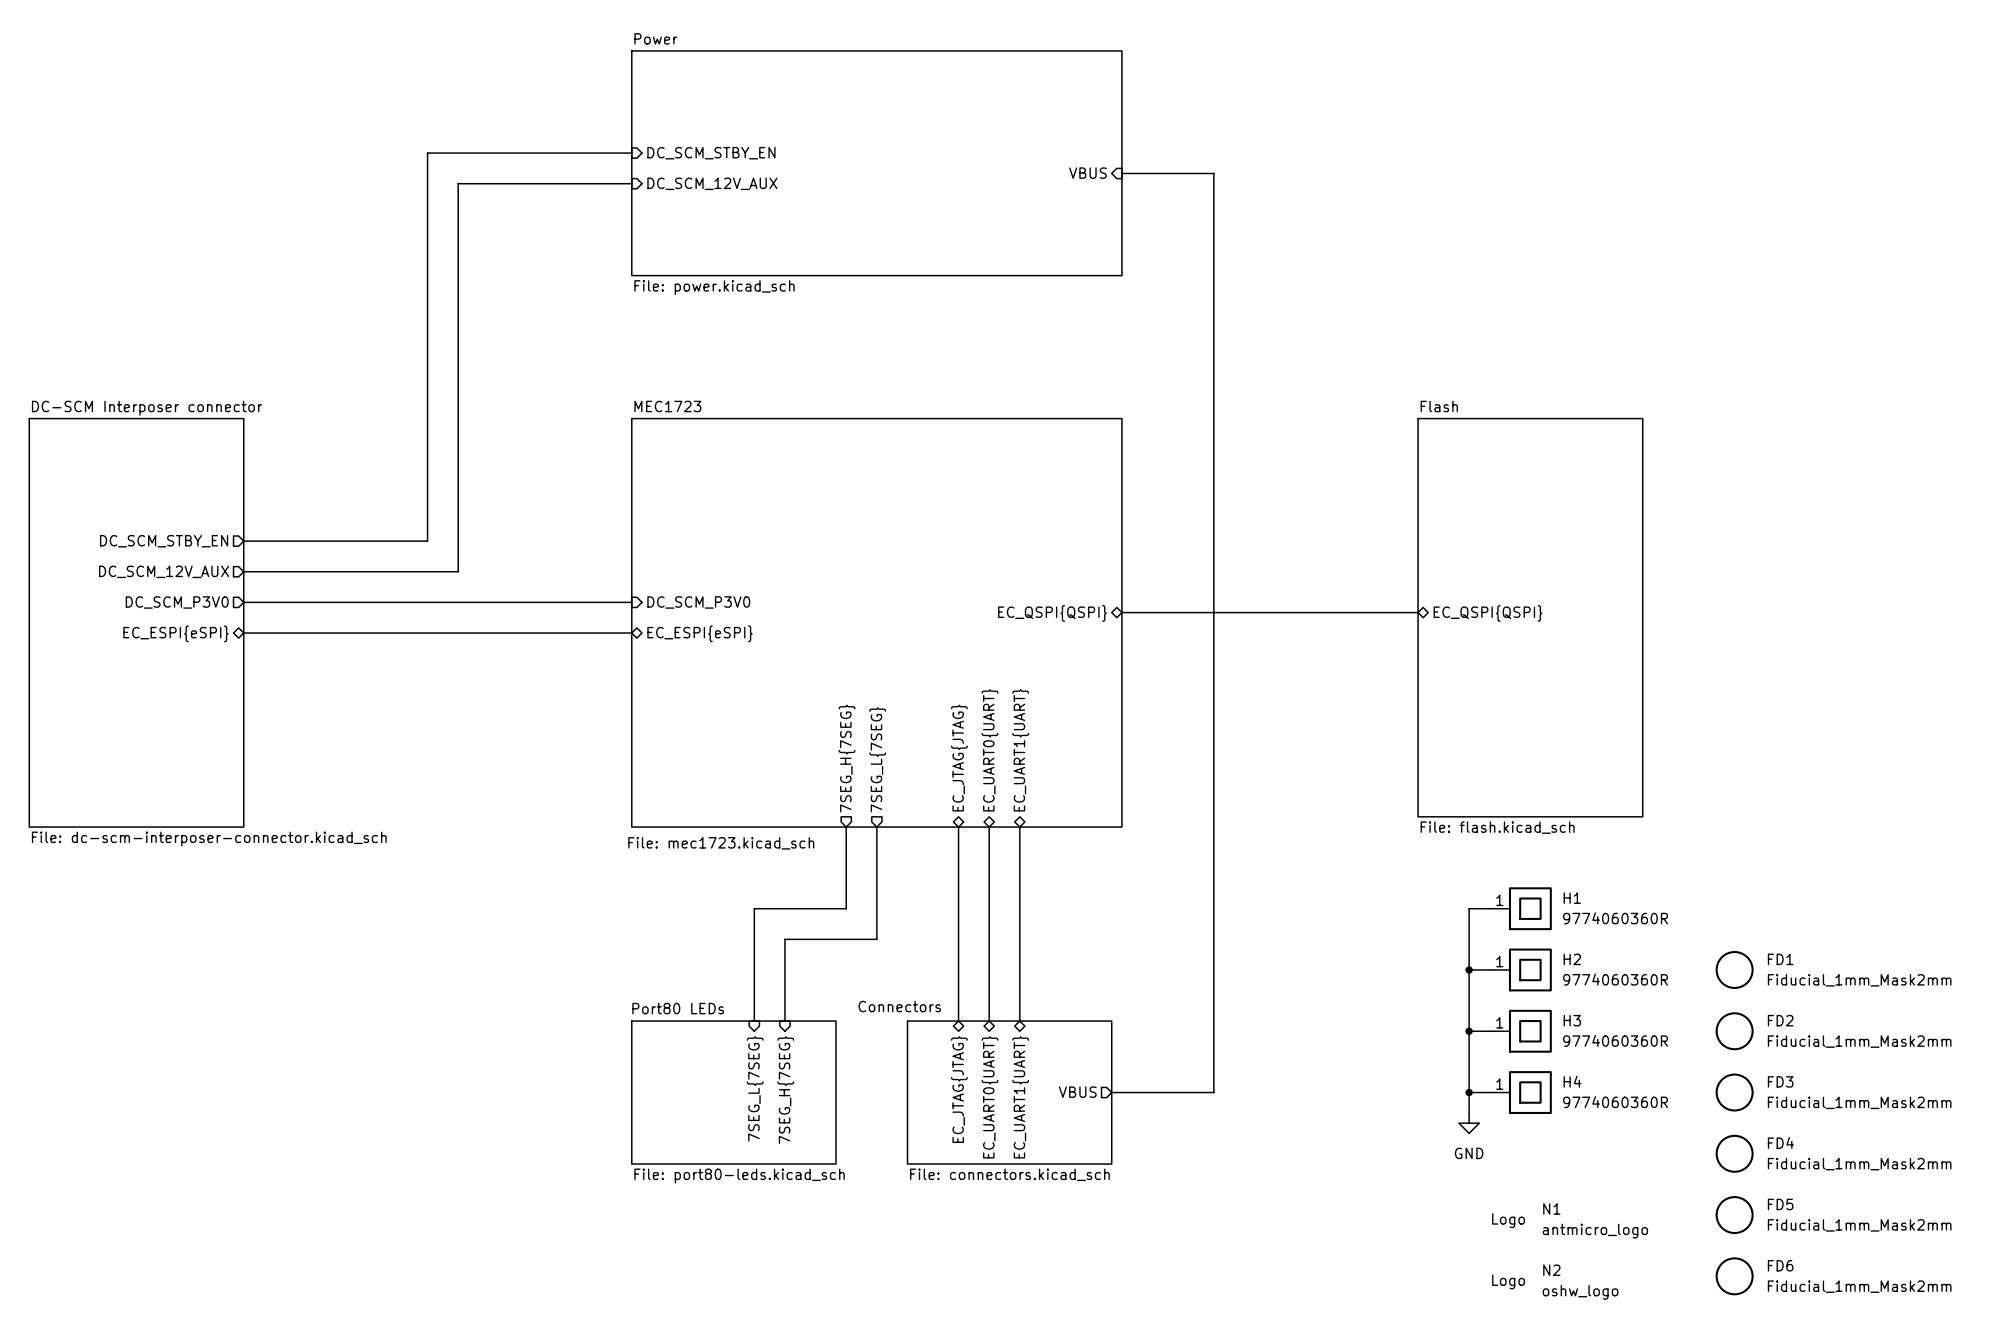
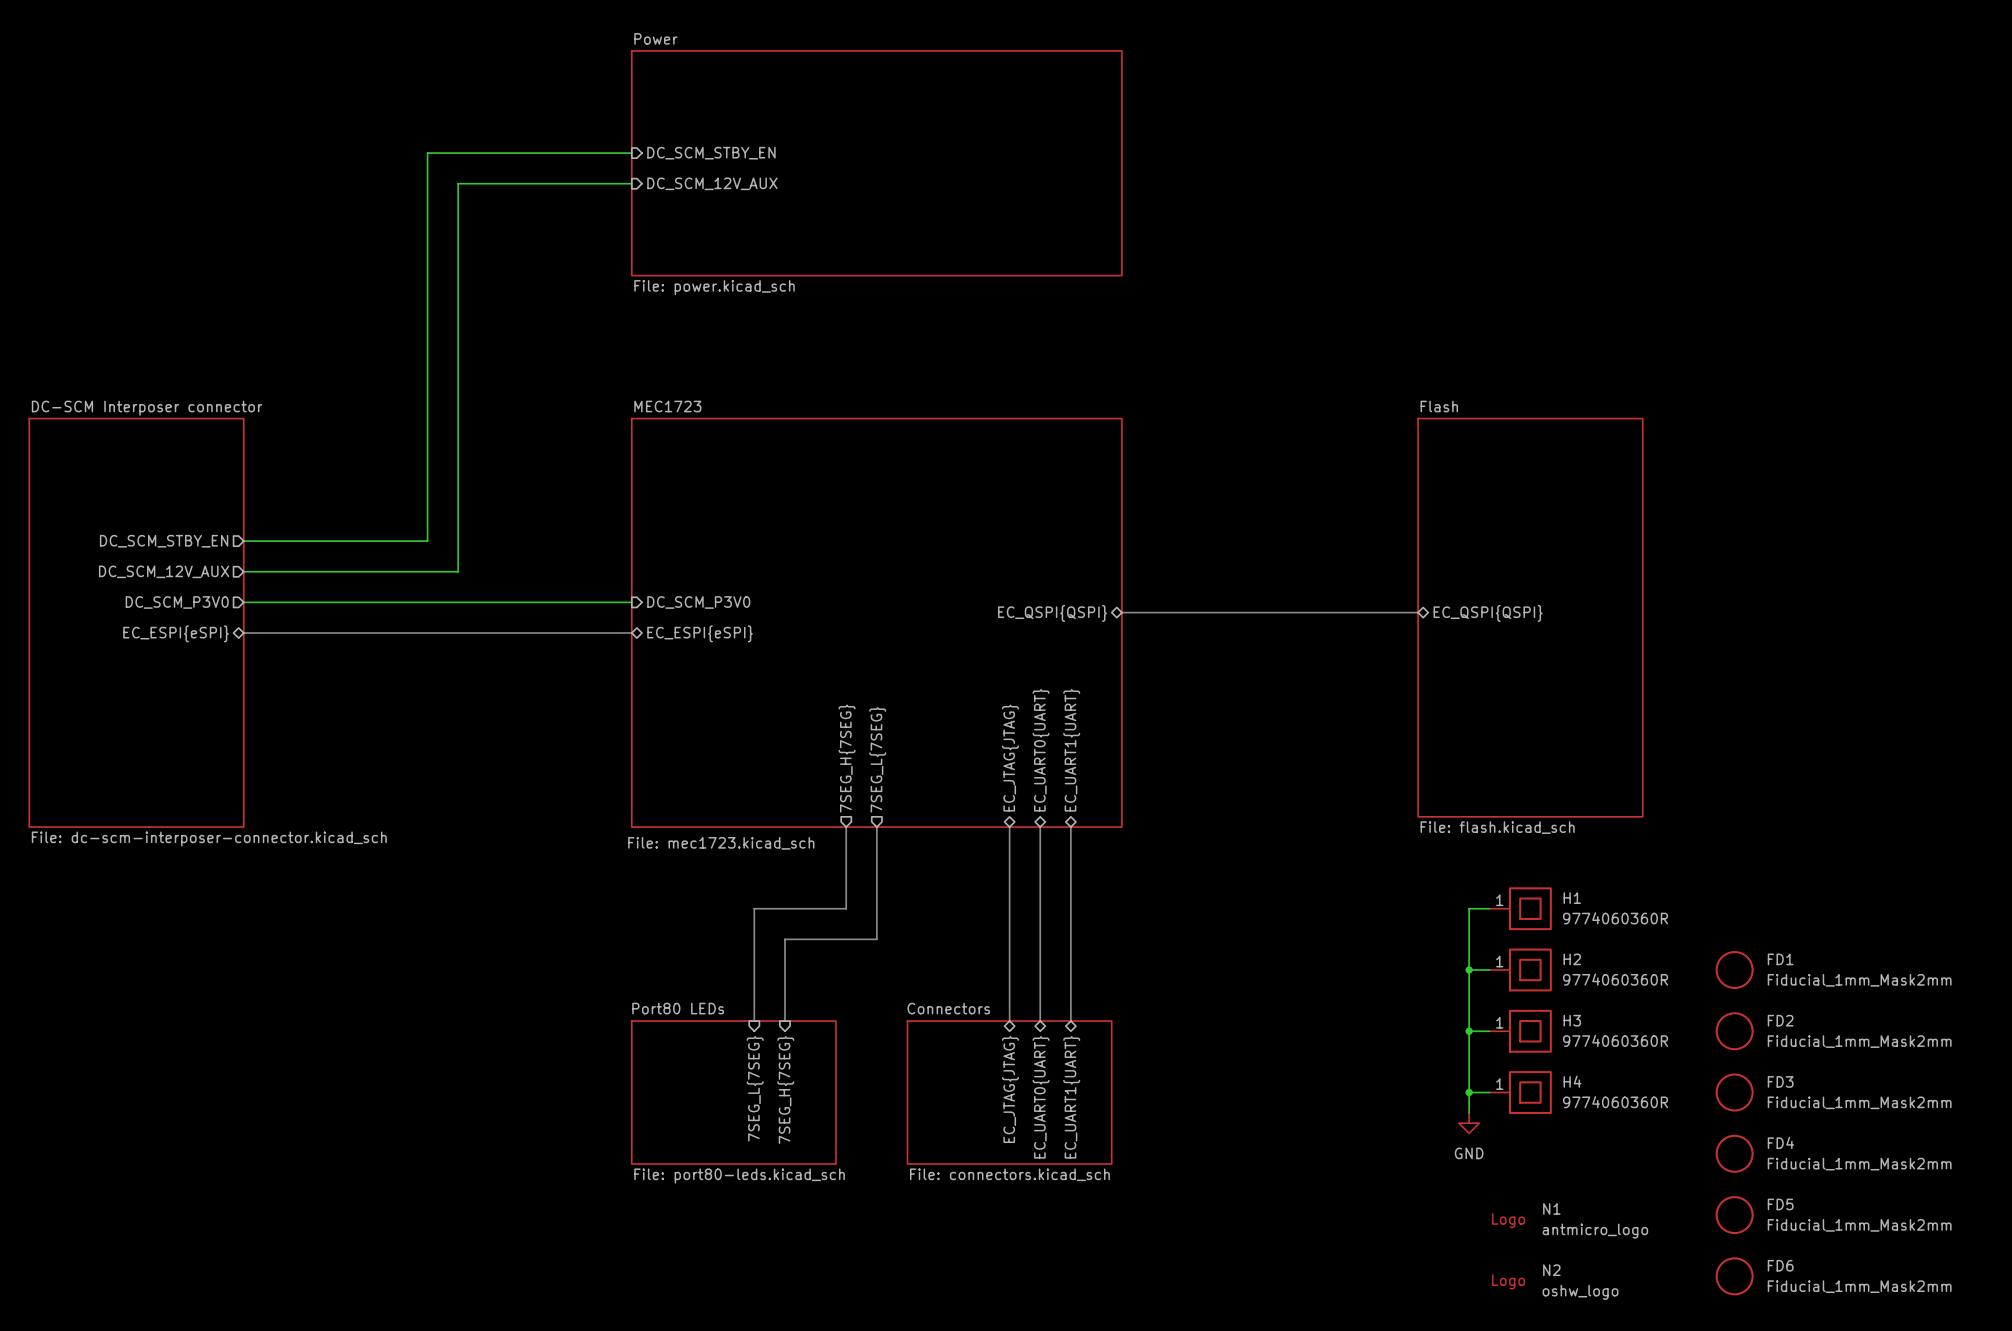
sheet pin: VBUS (1087, 173) -> none
wire: (1121, 173) (1213, 173) (1213, 1092) (1111, 1092) -> none
sheet pin position: EC_UART0{UART} (990, 750) -> EC_UART0{UART} (1041, 750)
sheet pin position: EC_UART1{UART} (1020, 750) -> EC_UART1{UART} (1071, 750)
sheet pin position: EC_JTAG{JTAG} (959, 758) -> EC_JTAG{JTAG} (1010, 758)
bus: (958, 827) (958, 1021) -> (1009, 827) (1009, 1021)
bus: (989, 827) (989, 1021) -> (1040, 827) (1040, 1021)
bus: (1019, 827) (1019, 1021) -> (1070, 827) (1070, 1021)
sheet Connectors name position: Connectors (899, 1006) -> Connectors (948, 1008)
sheet pin position: EC_JTAG{JTAG} (959, 1089) -> EC_JTAG{JTAG} (1010, 1089)
sheet pin: VBUS (1077, 1092) -> none
sheet pin position: EC_UART0{UART} (990, 1097) -> EC_UART0{UART} (1041, 1097)
sheet pin position: EC_UART1{UART} (1020, 1097) -> EC_UART1{UART} (1071, 1097)

